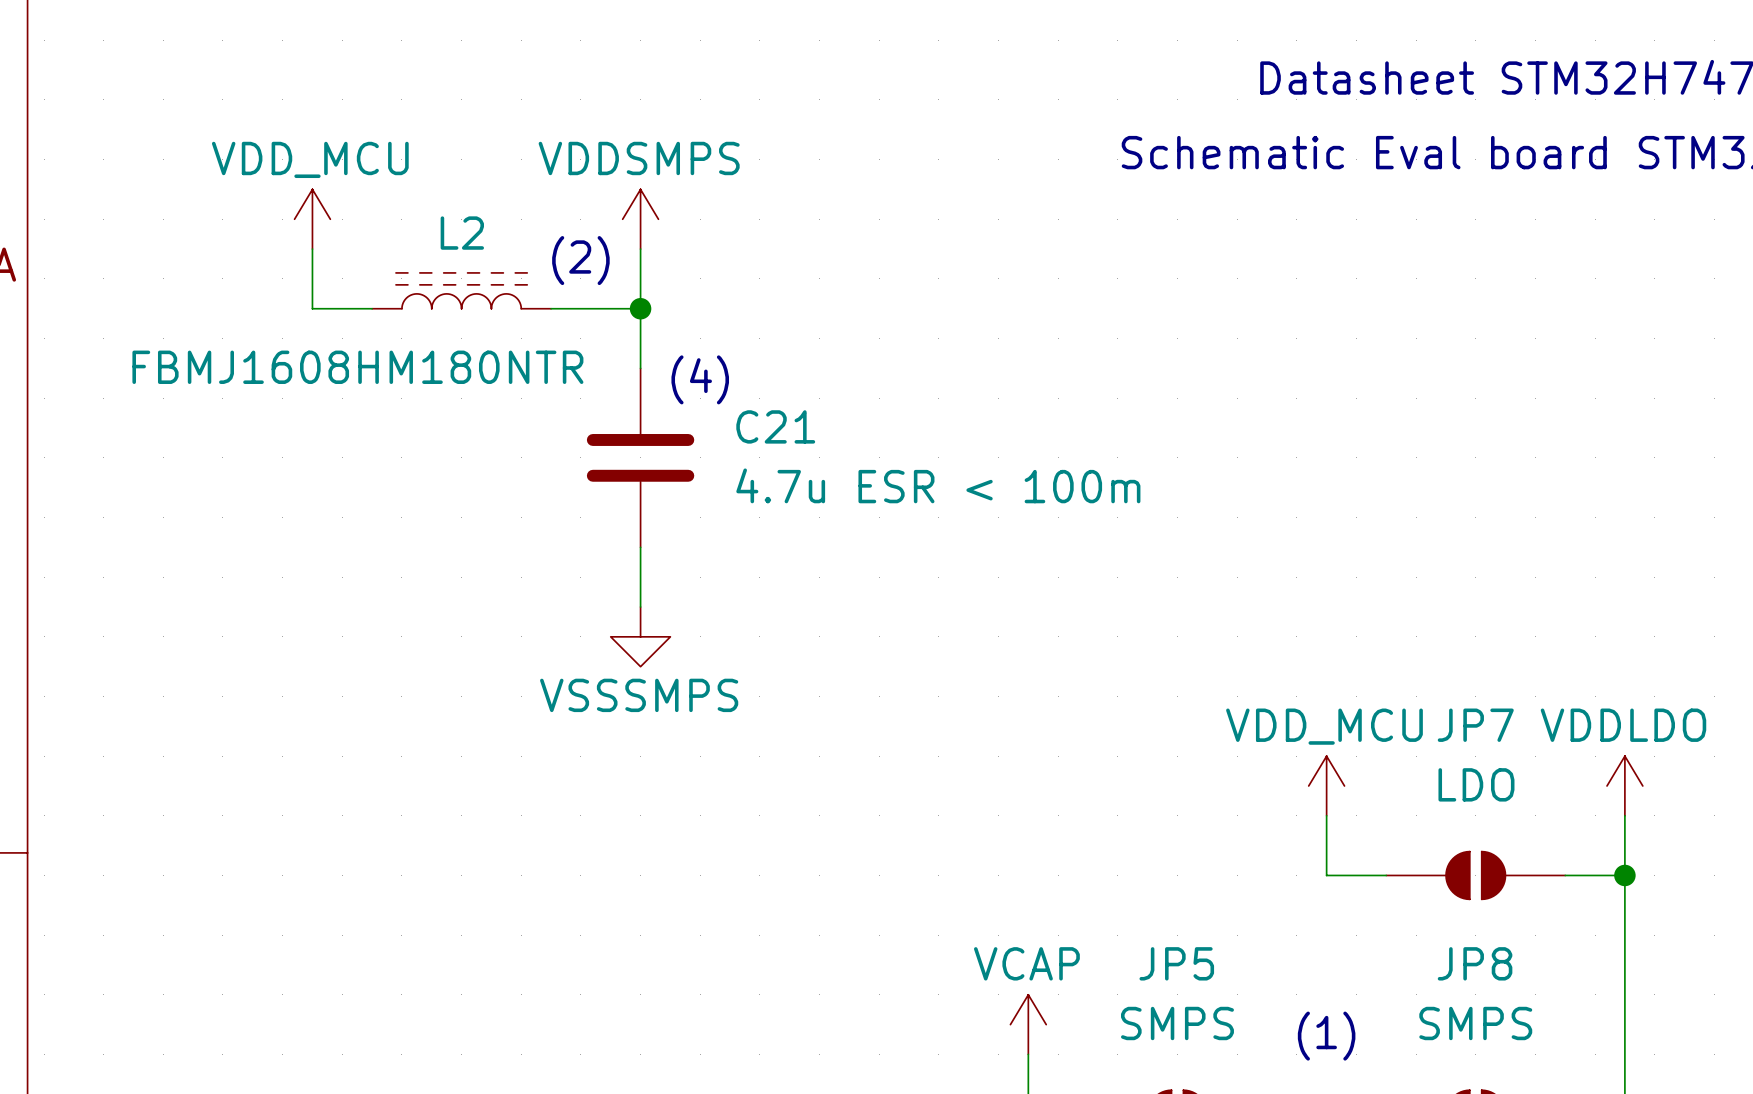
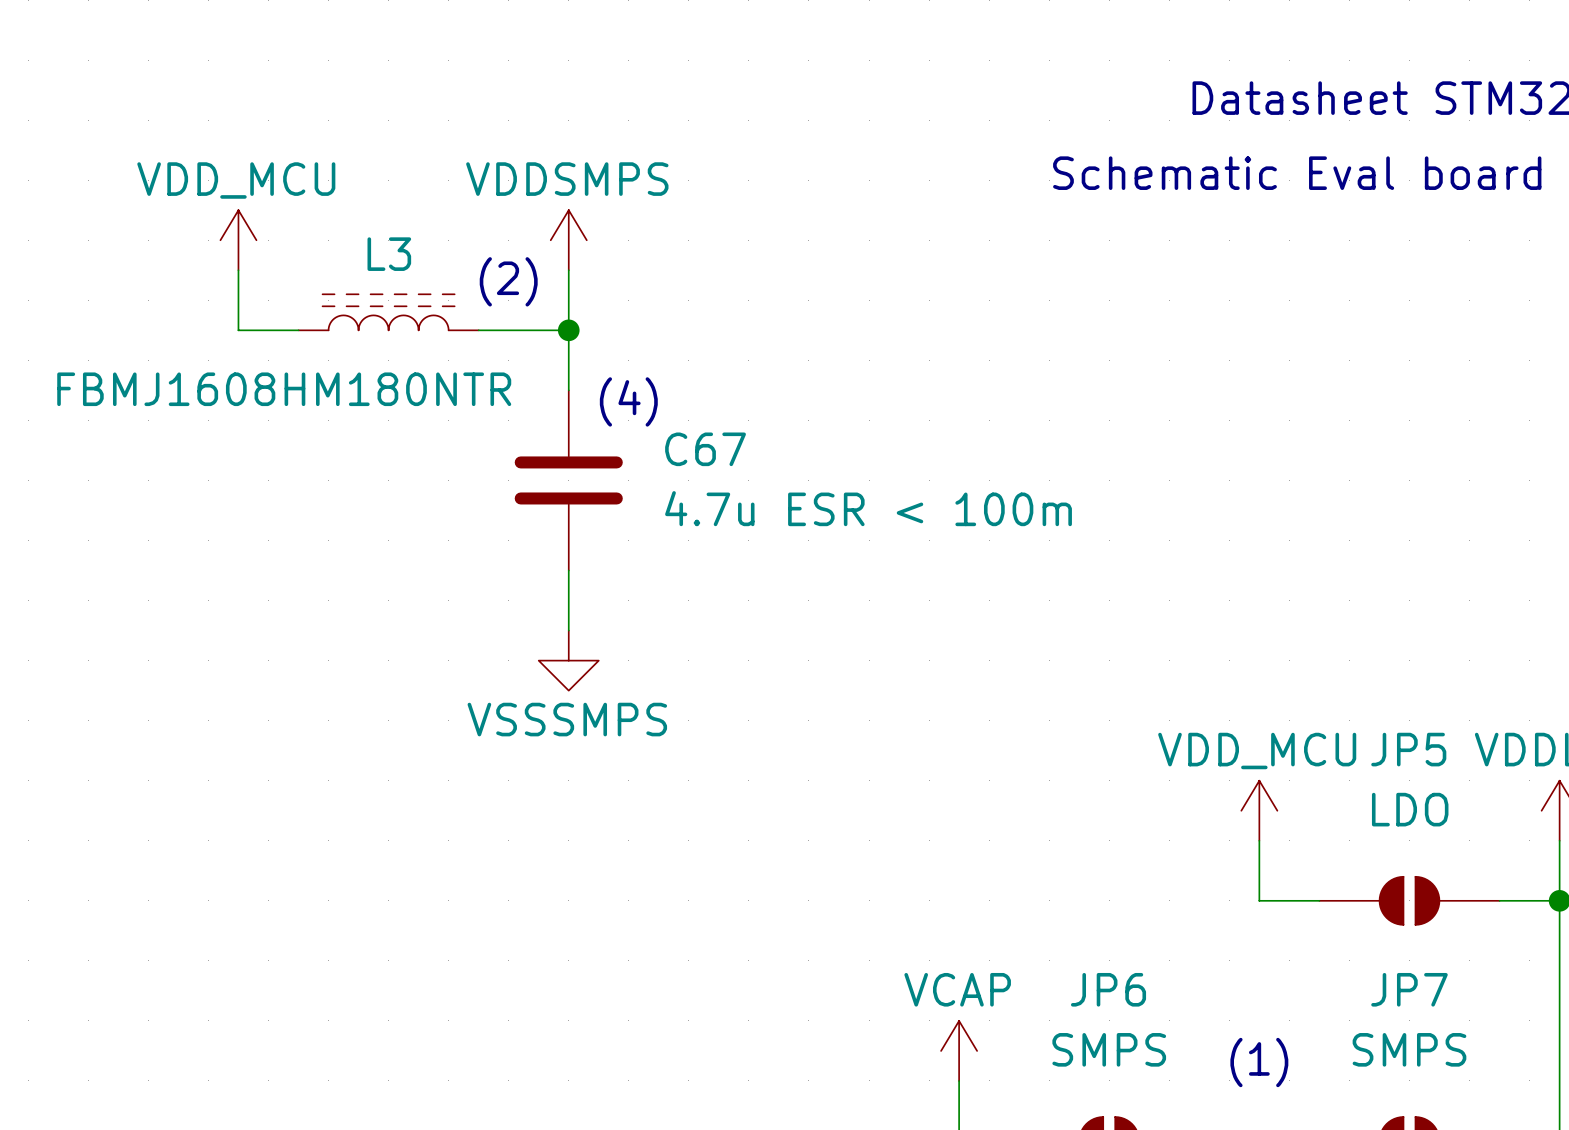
L2 name: L2 (462, 233) -> L3 (389, 254)
C21 name: C21 (775, 426) -> C67 (705, 449)
JP7 name: JP7 (1475, 725) -> JP5 (1408, 749)
JP5 name: JP5 (1176, 963) -> JP6 (1108, 989)
JP8 name: JP8 (1475, 963) -> JP7 (1409, 989)

